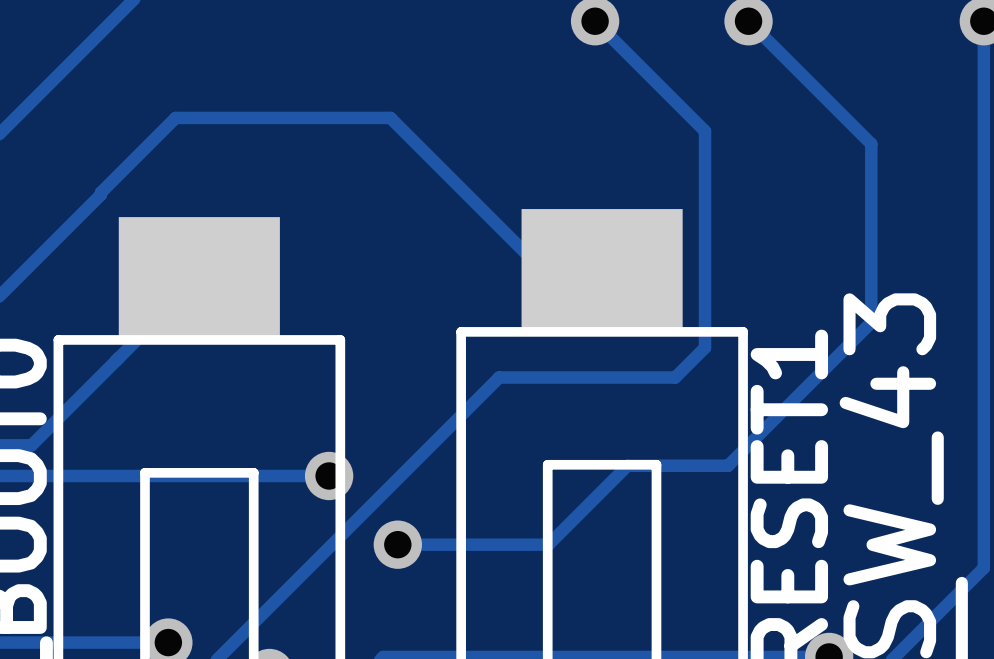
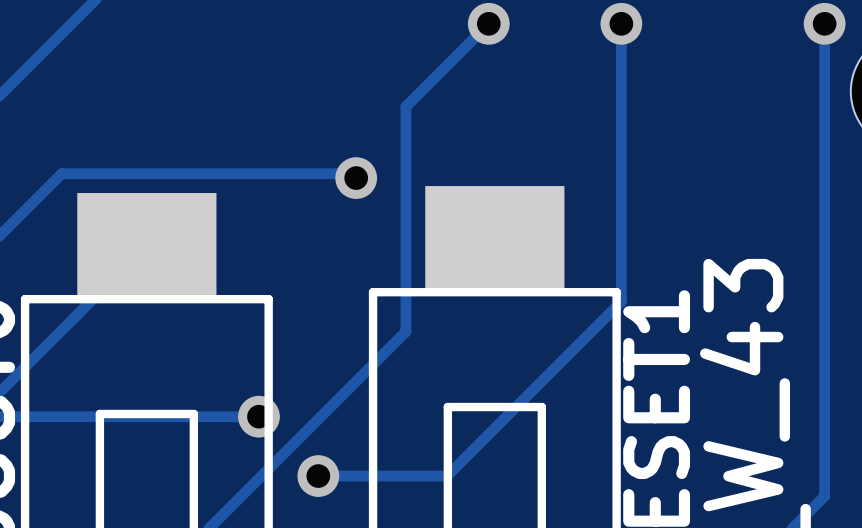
track: (595, 21) (705, 131) (705, 347) (675, 377) (499, 377) -> (488, 23) (405, 106) (405, 331)
track: (748, 21) (871, 143) (871, 322) (728, 465) (627, 465) (546, 544) -> (621, 23) (621, 301) (447, 476)
track: (100, 194) (175, 117) (390, 117) (542, 269) (602, 269) -> (61, 173) (351, 173) (356, 178)
via: none -> (356, 178)

